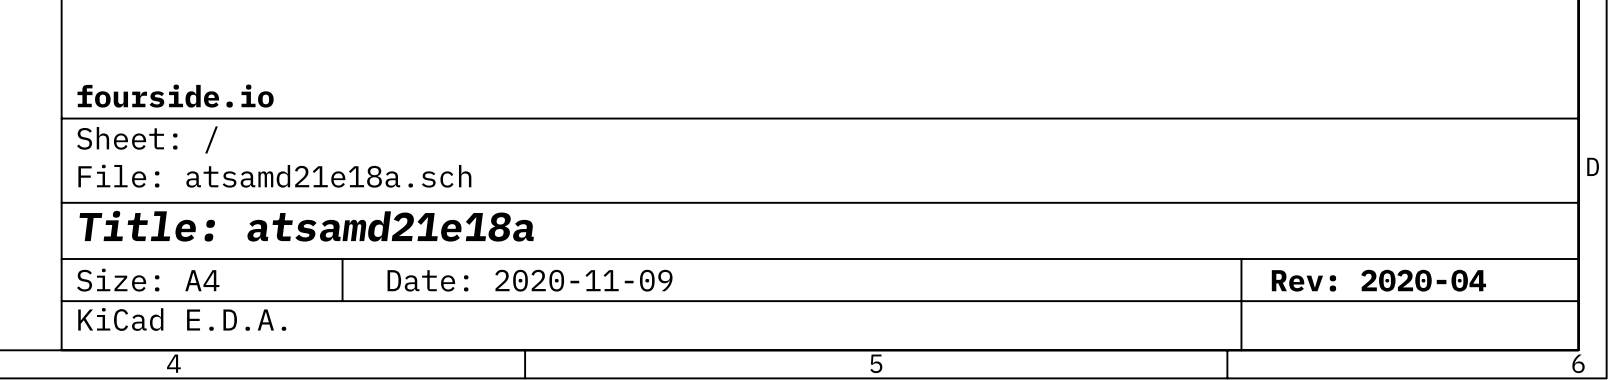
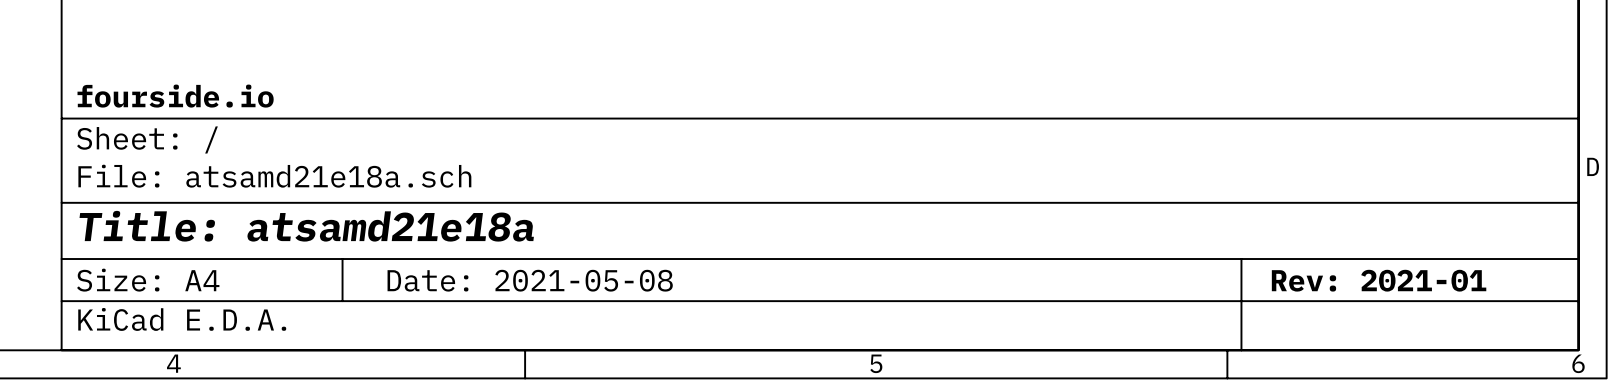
title block: Date: 2020-11-09 (530, 280) -> Date: 2021-05-08 (530, 280)
title block: Rev: 2020-04 (1378, 280) -> Rev: 2021-01 (1379, 280)

